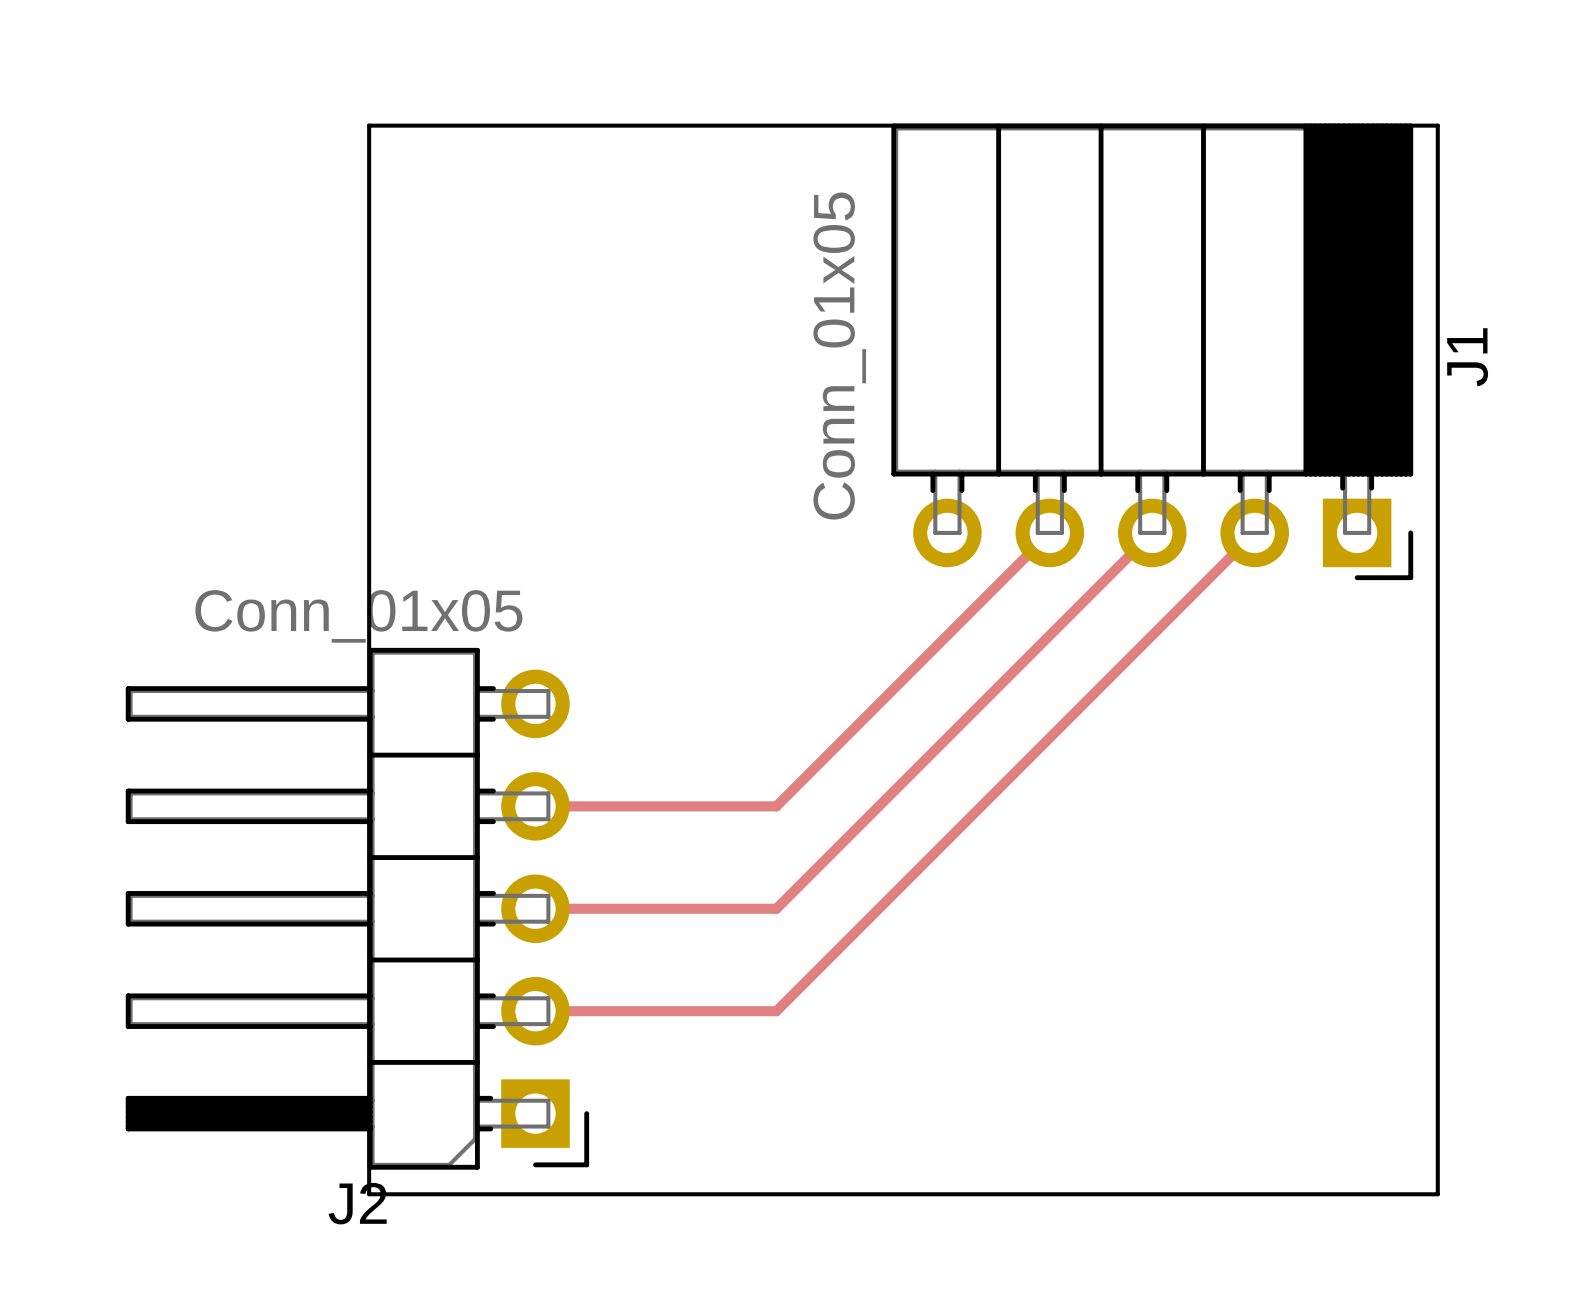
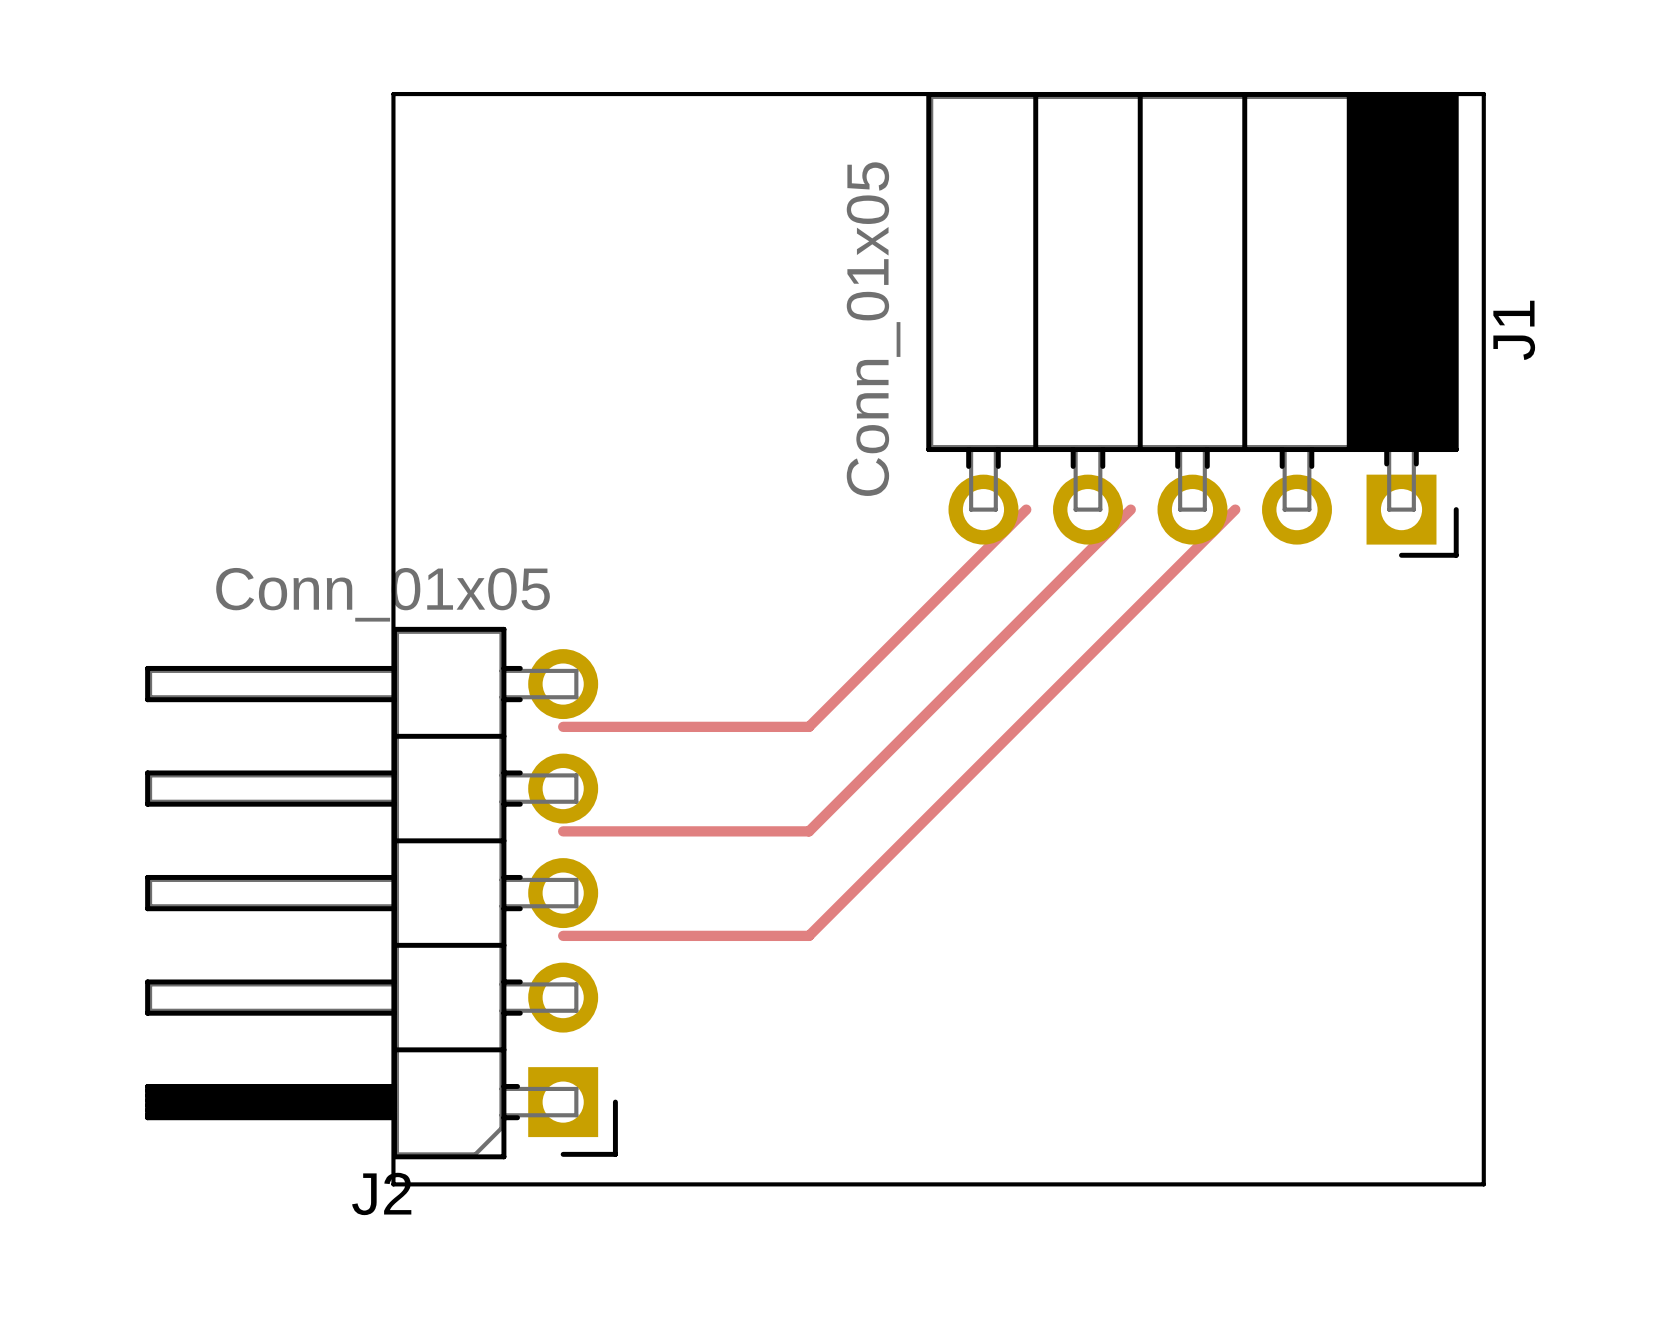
top track: none -> (1026, 509) (809, 726) (563, 726)
top track: (1049, 532) (776, 806) (535, 806) -> none
top track: none -> (1130, 509) (809, 831) (563, 831)
top track: (1152, 532) (776, 908) (535, 908) -> none
top track: none -> (1235, 509) (809, 935) (563, 935)
top track: (1254, 532) (776, 1011) (535, 1011) -> none

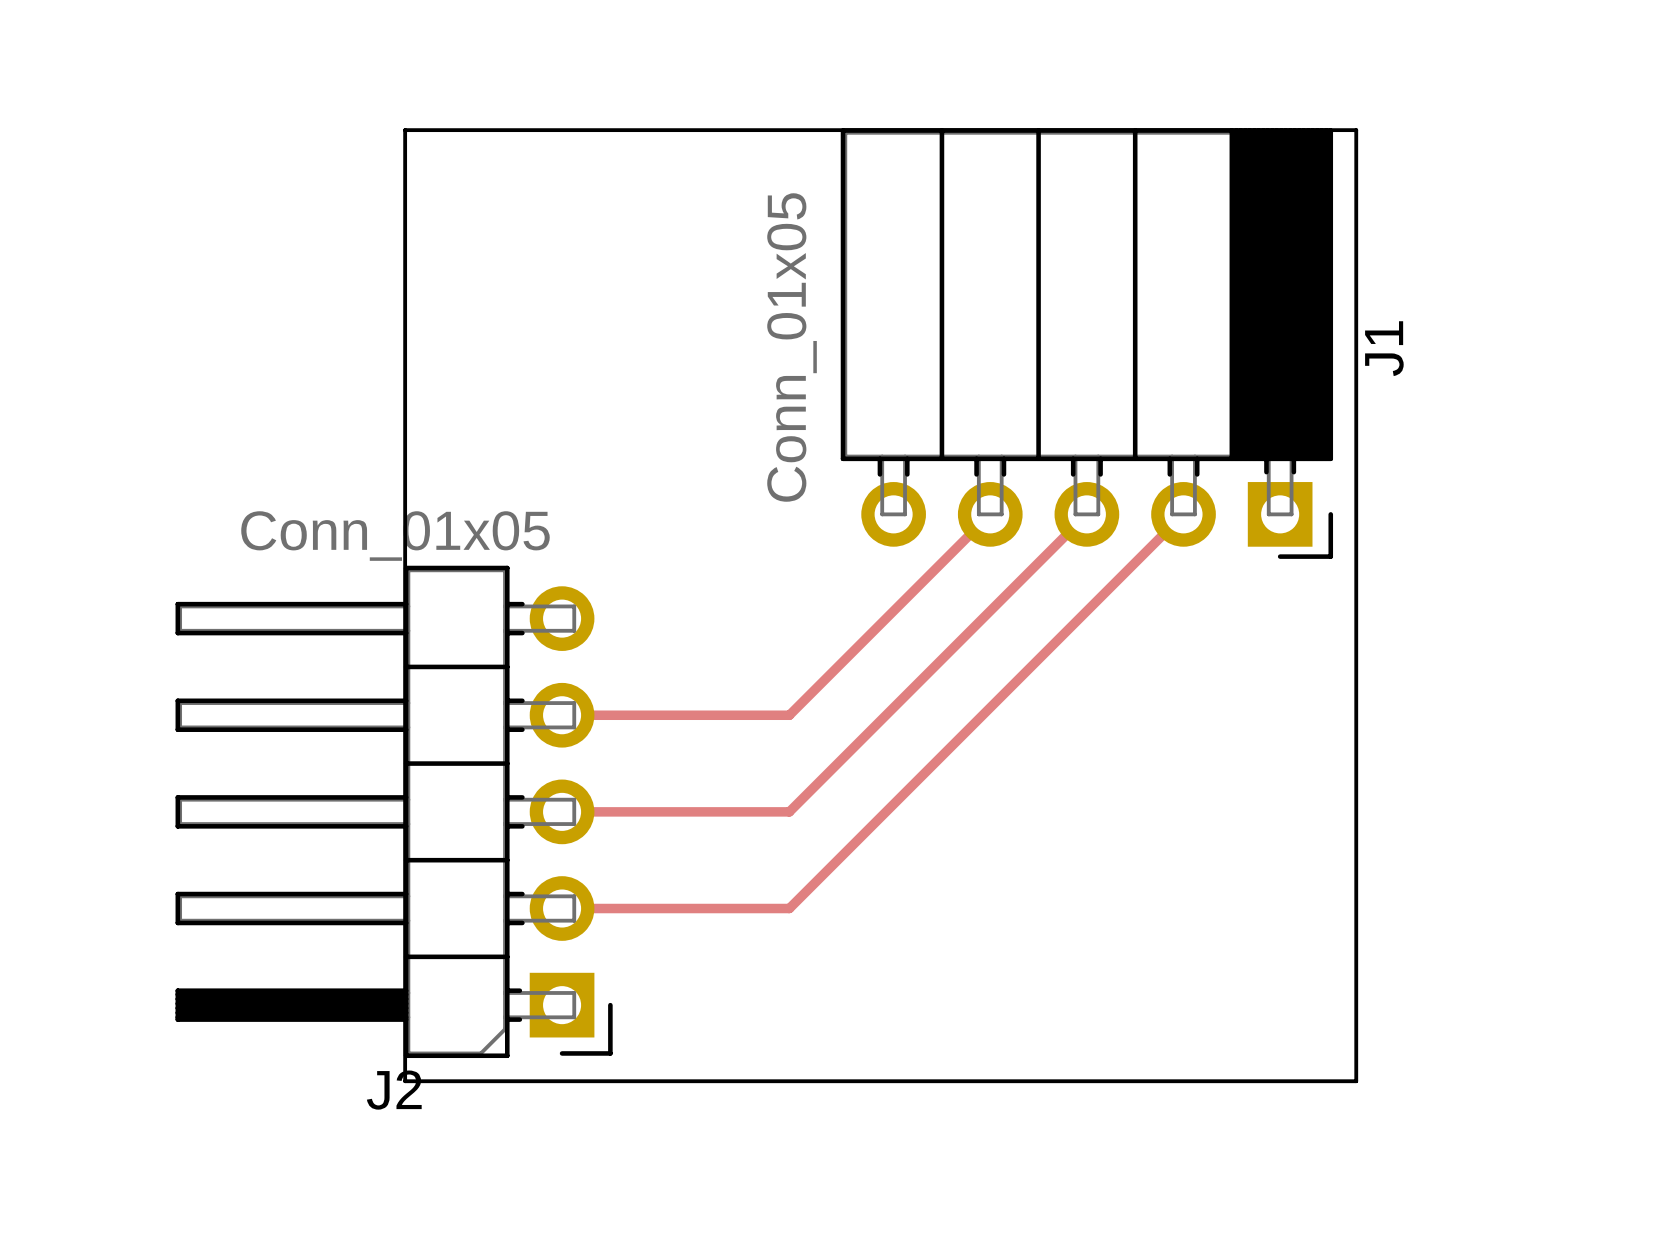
board edge: (1422, 94) (1483, 94) (1483, 1184) (393, 1184) (393, 1122) -> (1356, 130) (1356, 1081) (405, 1081)
J1 position: (1192, 324) -> (1086, 343)
J2 position: (381, 893) -> (394, 811)

